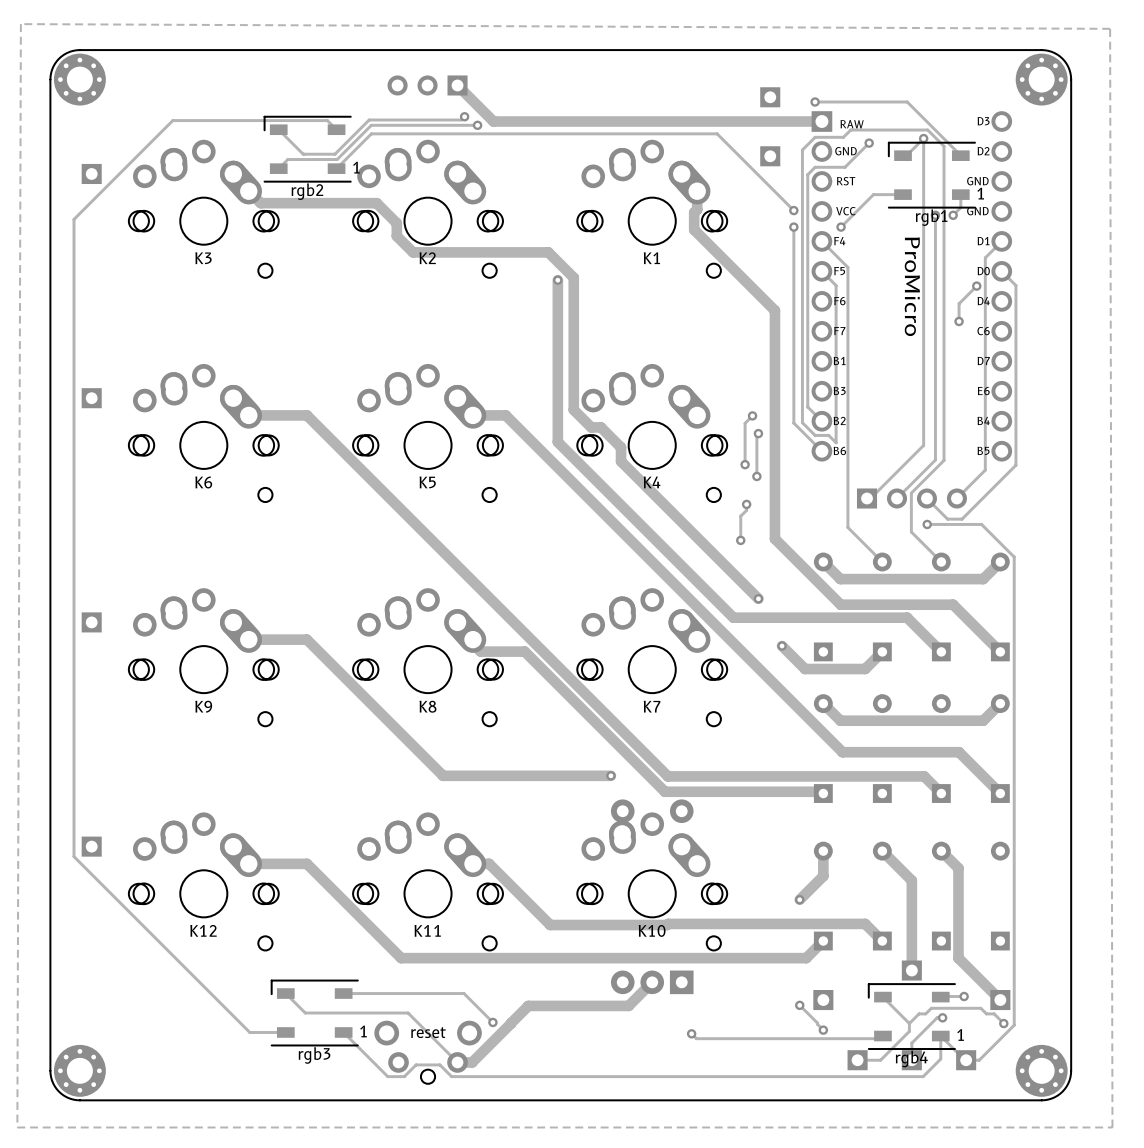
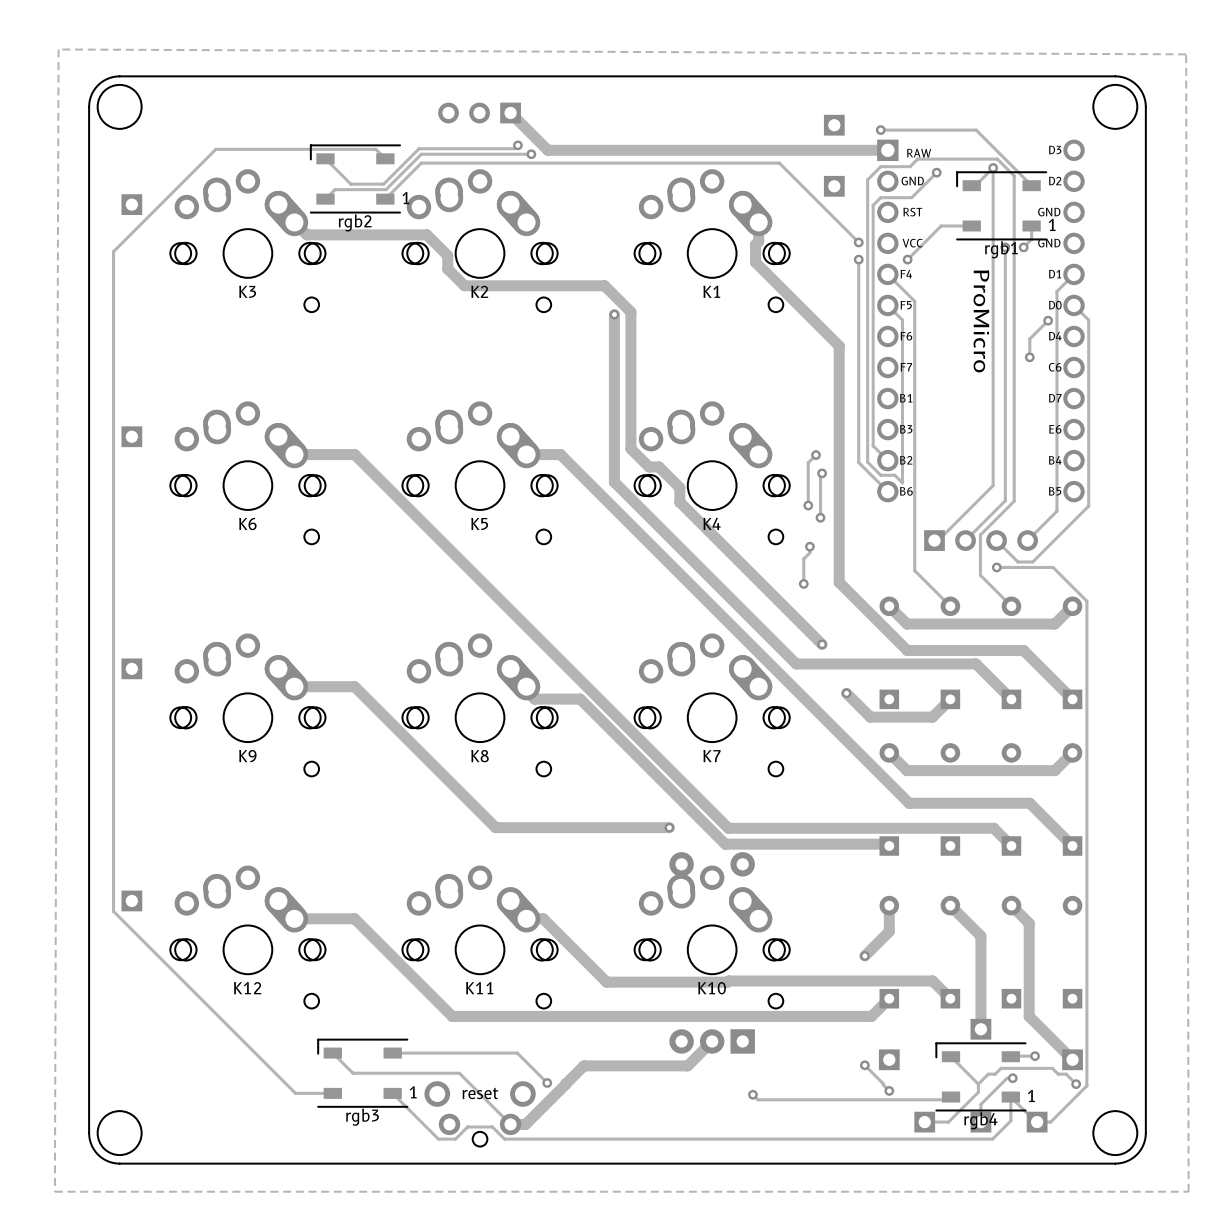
round board edge: none -> [97, 84, 142, 130]
round board edge: none -> [1093, 84, 1138, 130]
part: (79, 79) -> none
part: (1041, 79) -> none
round board edge: none -> [97, 1110, 142, 1156]
round board edge: none -> [1093, 1110, 1138, 1156]
part: (79, 1070) -> none
part: (1041, 1070) -> none

